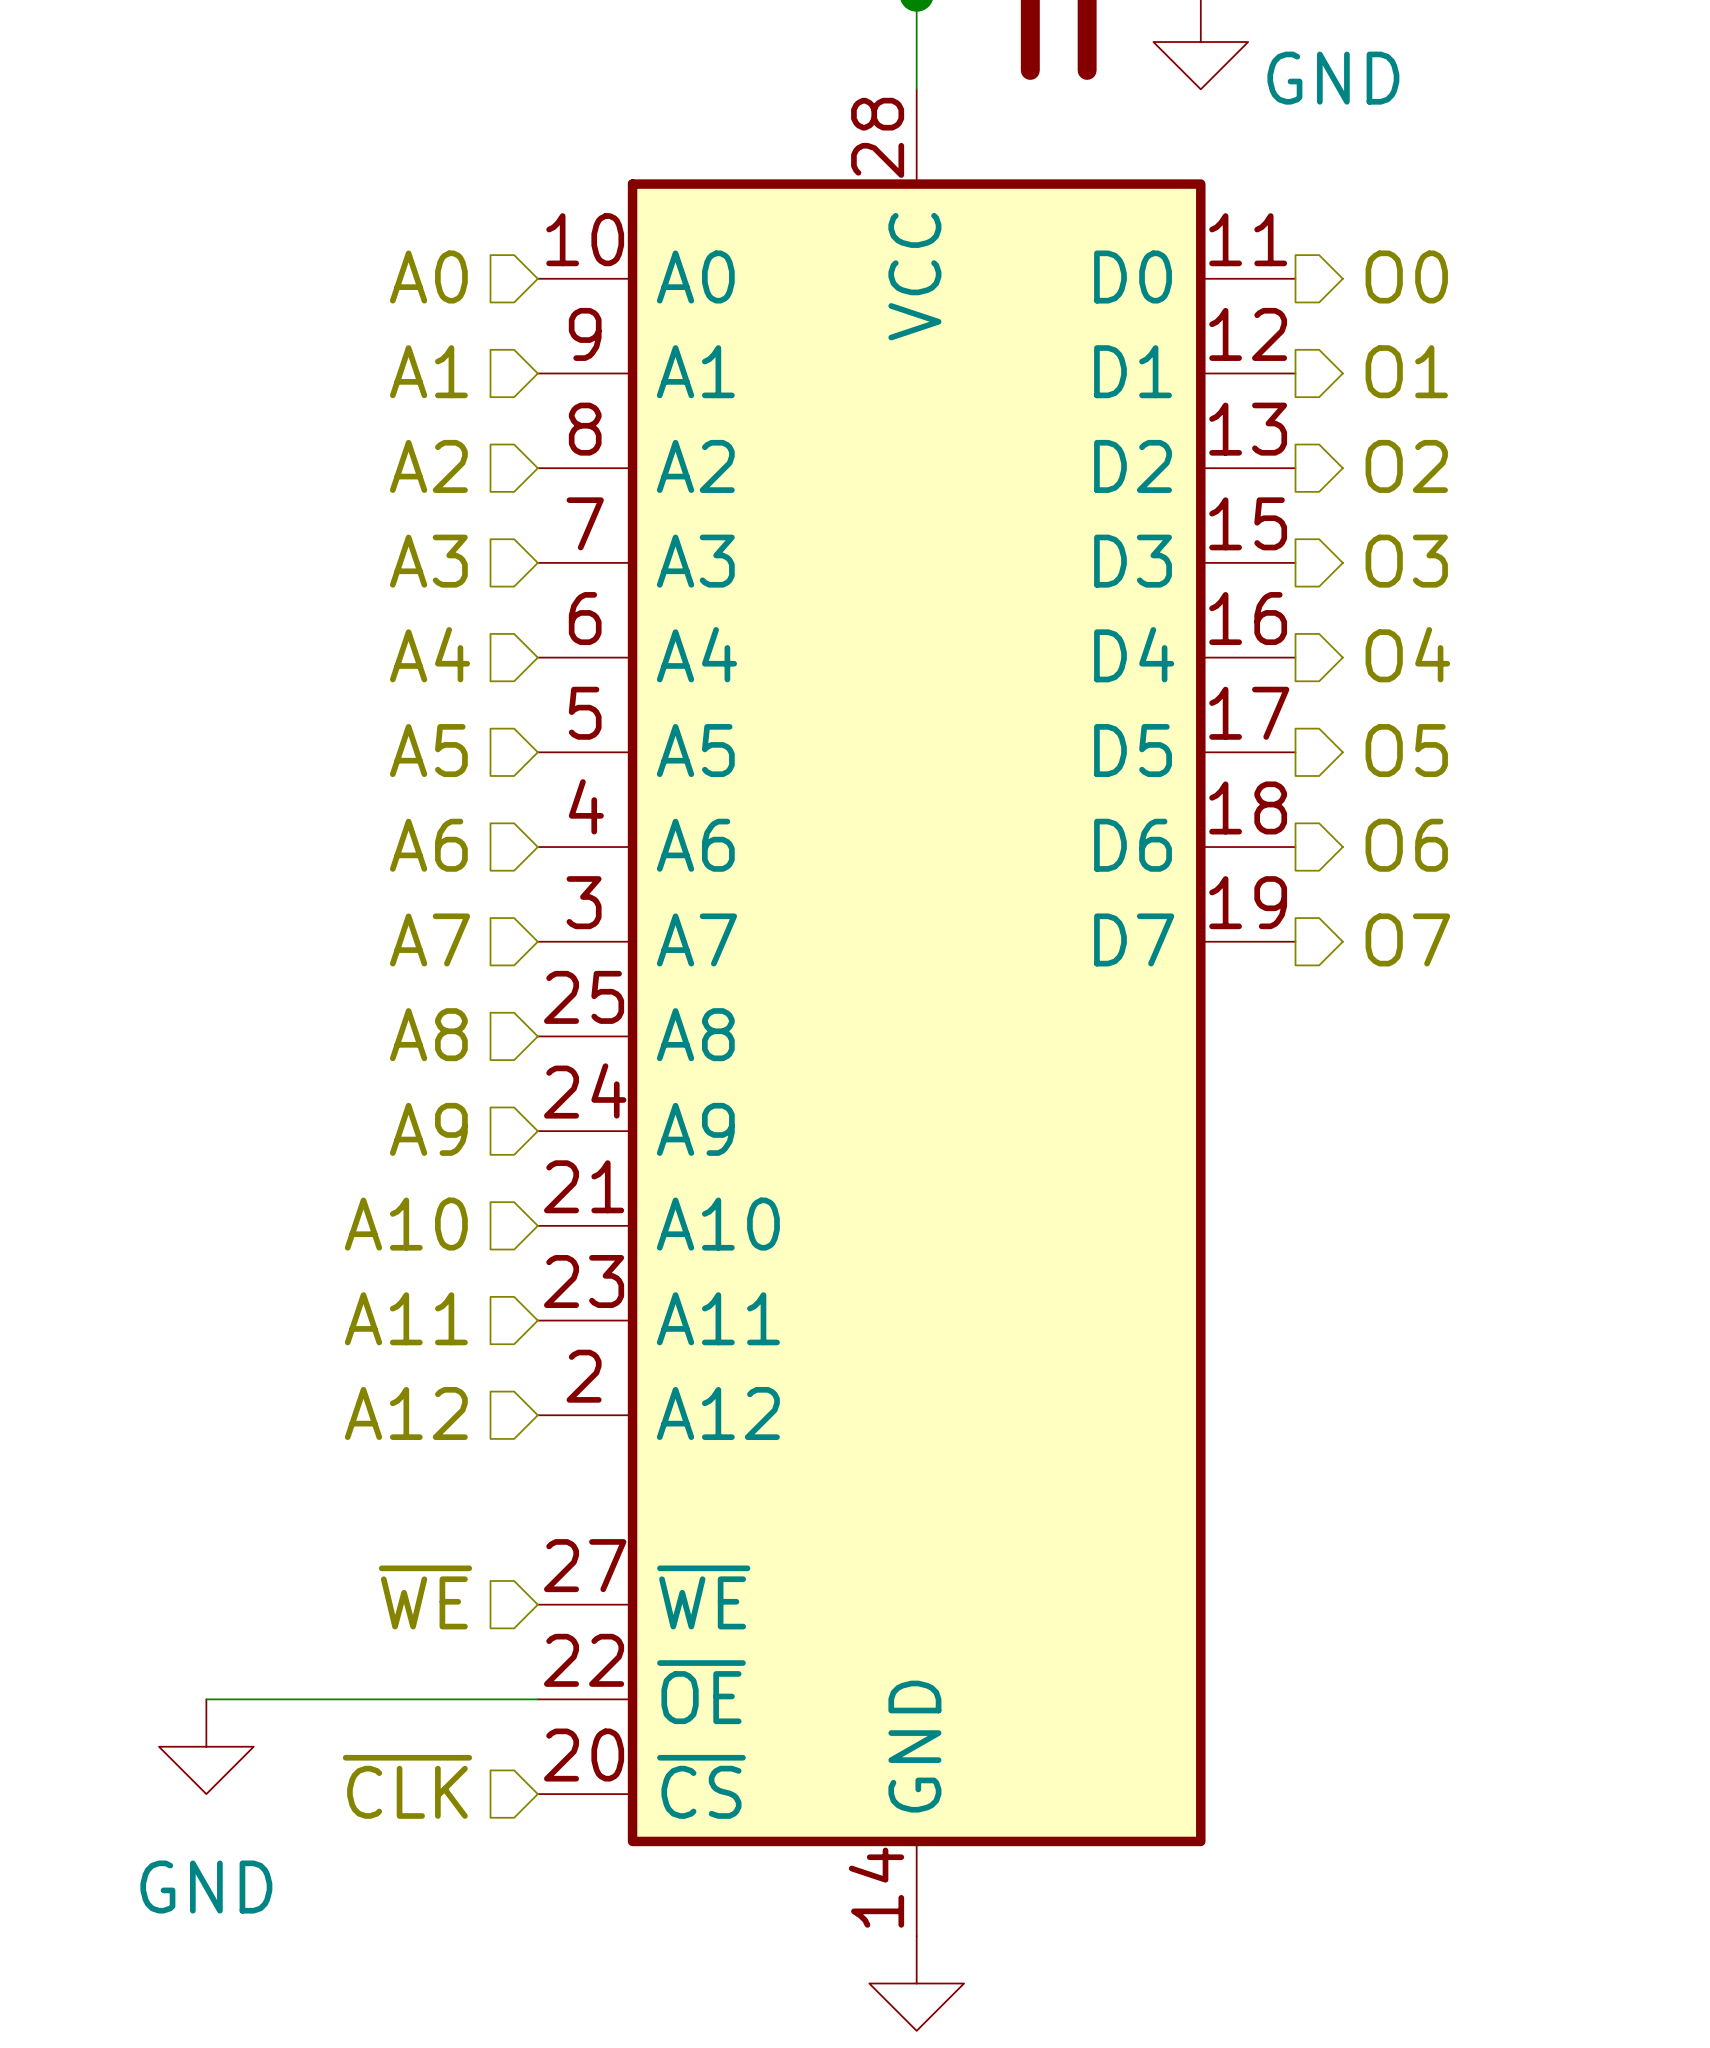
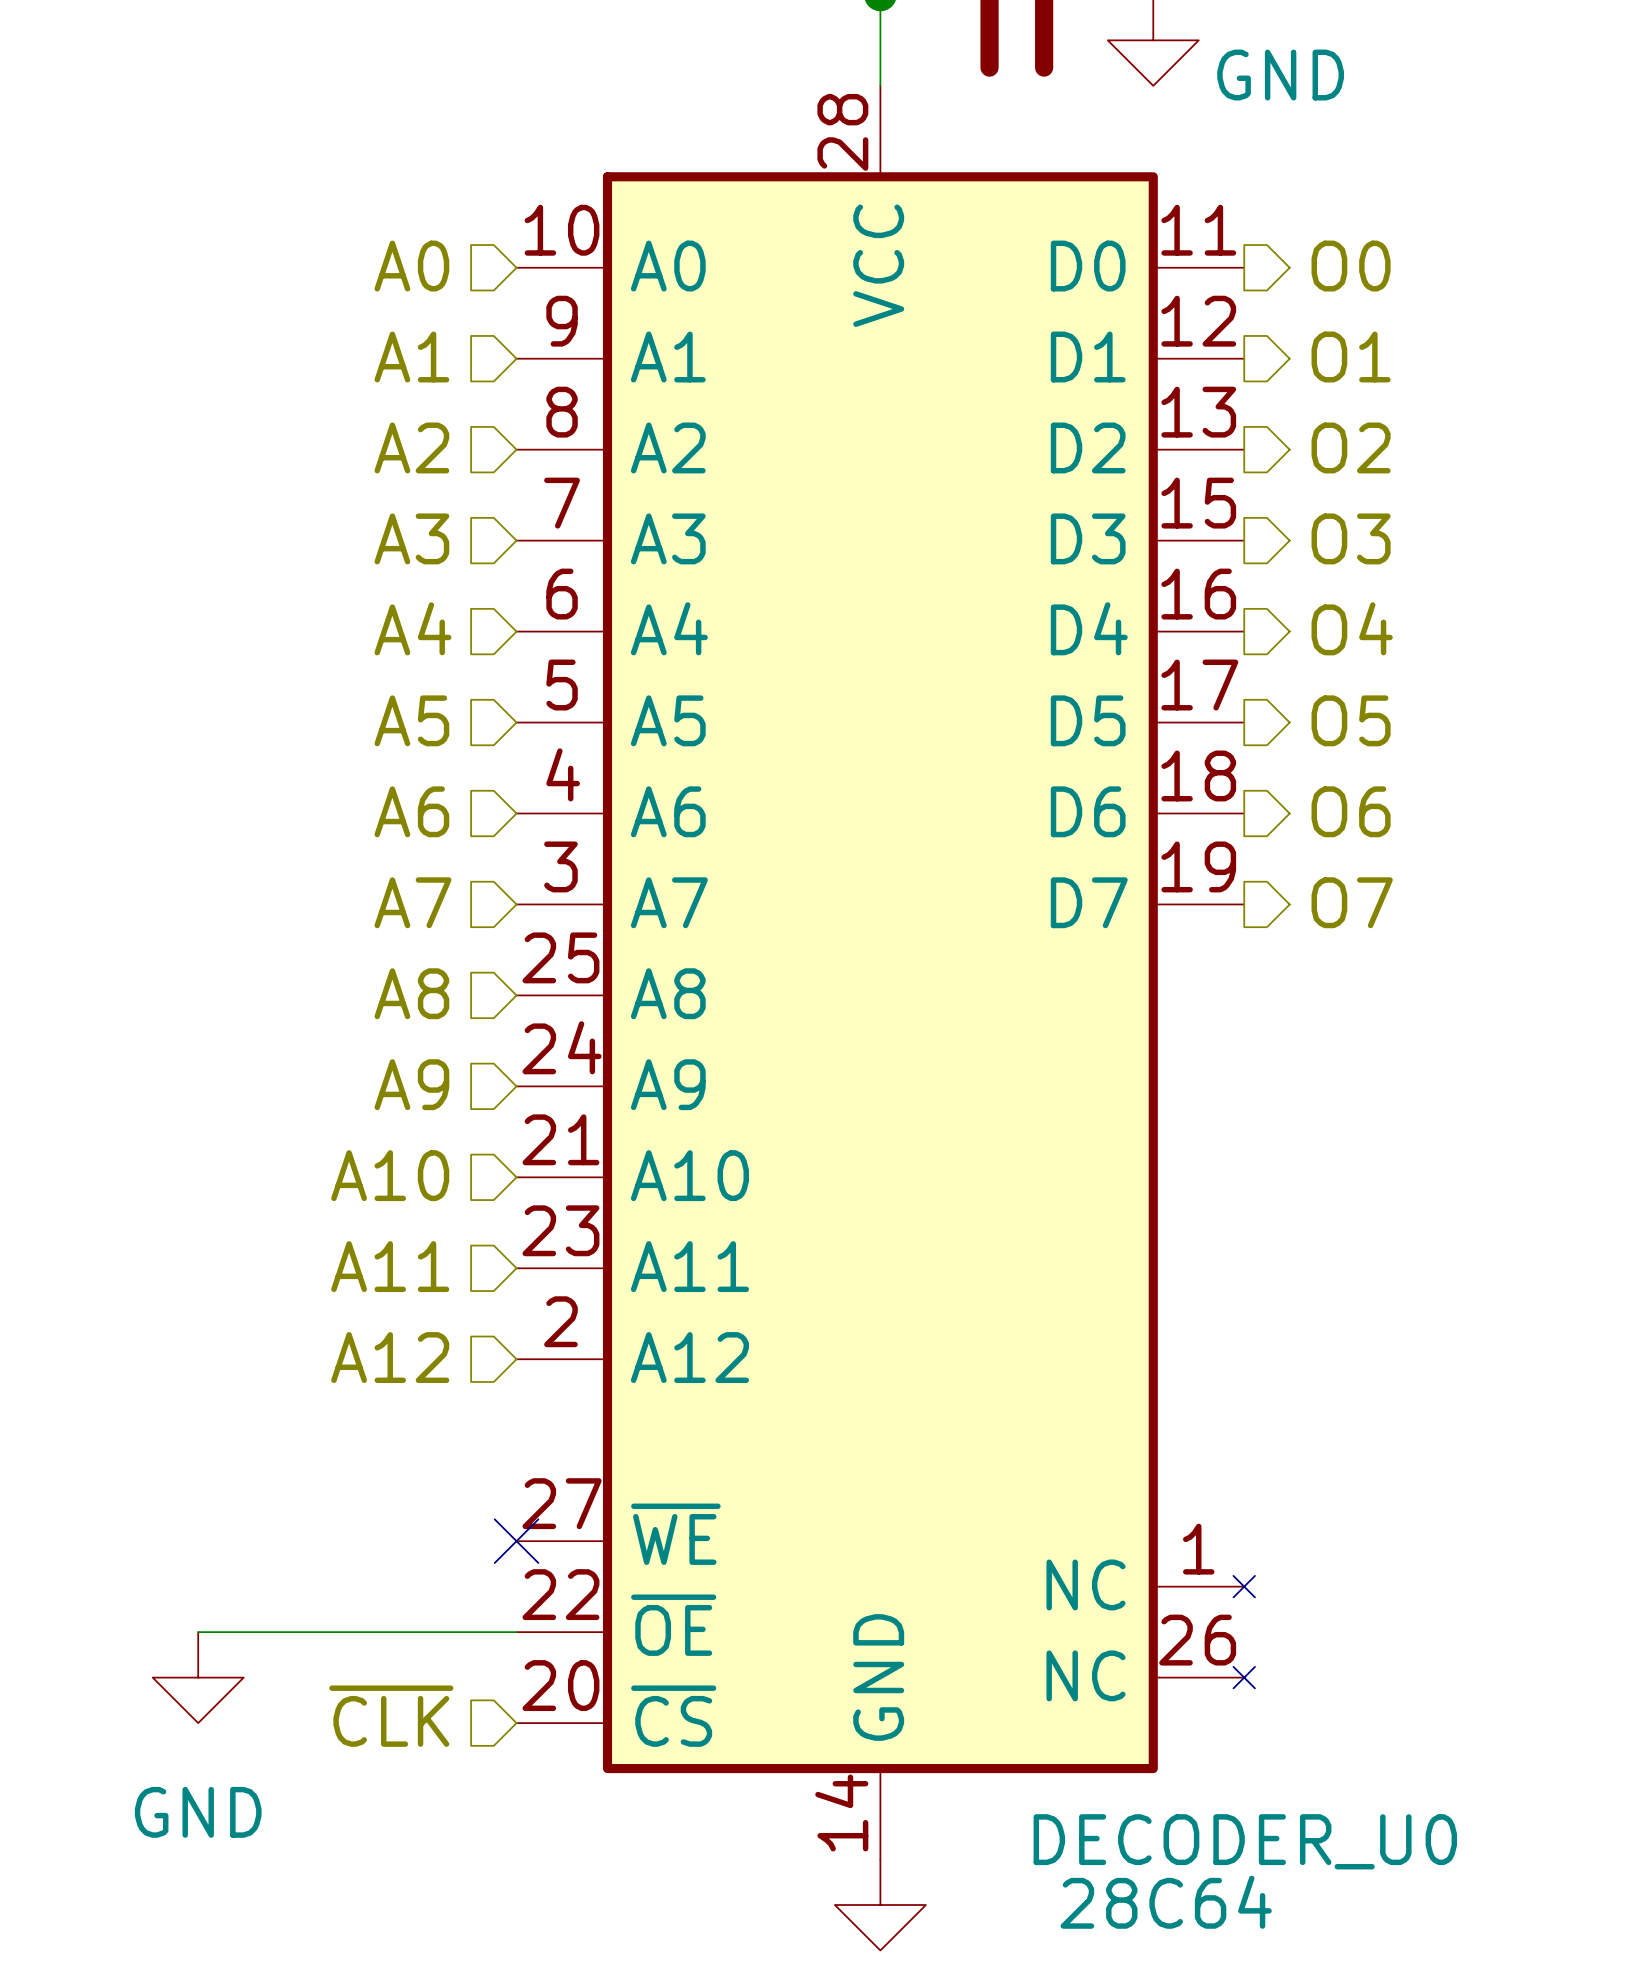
part: (916, 1012) -> none
DECODER_U0: none -> 28C64 (885, 972)
hierarchical label: ~{WE} (425, 1597) -> none
no-connect mark: none -> (516, 1541)

